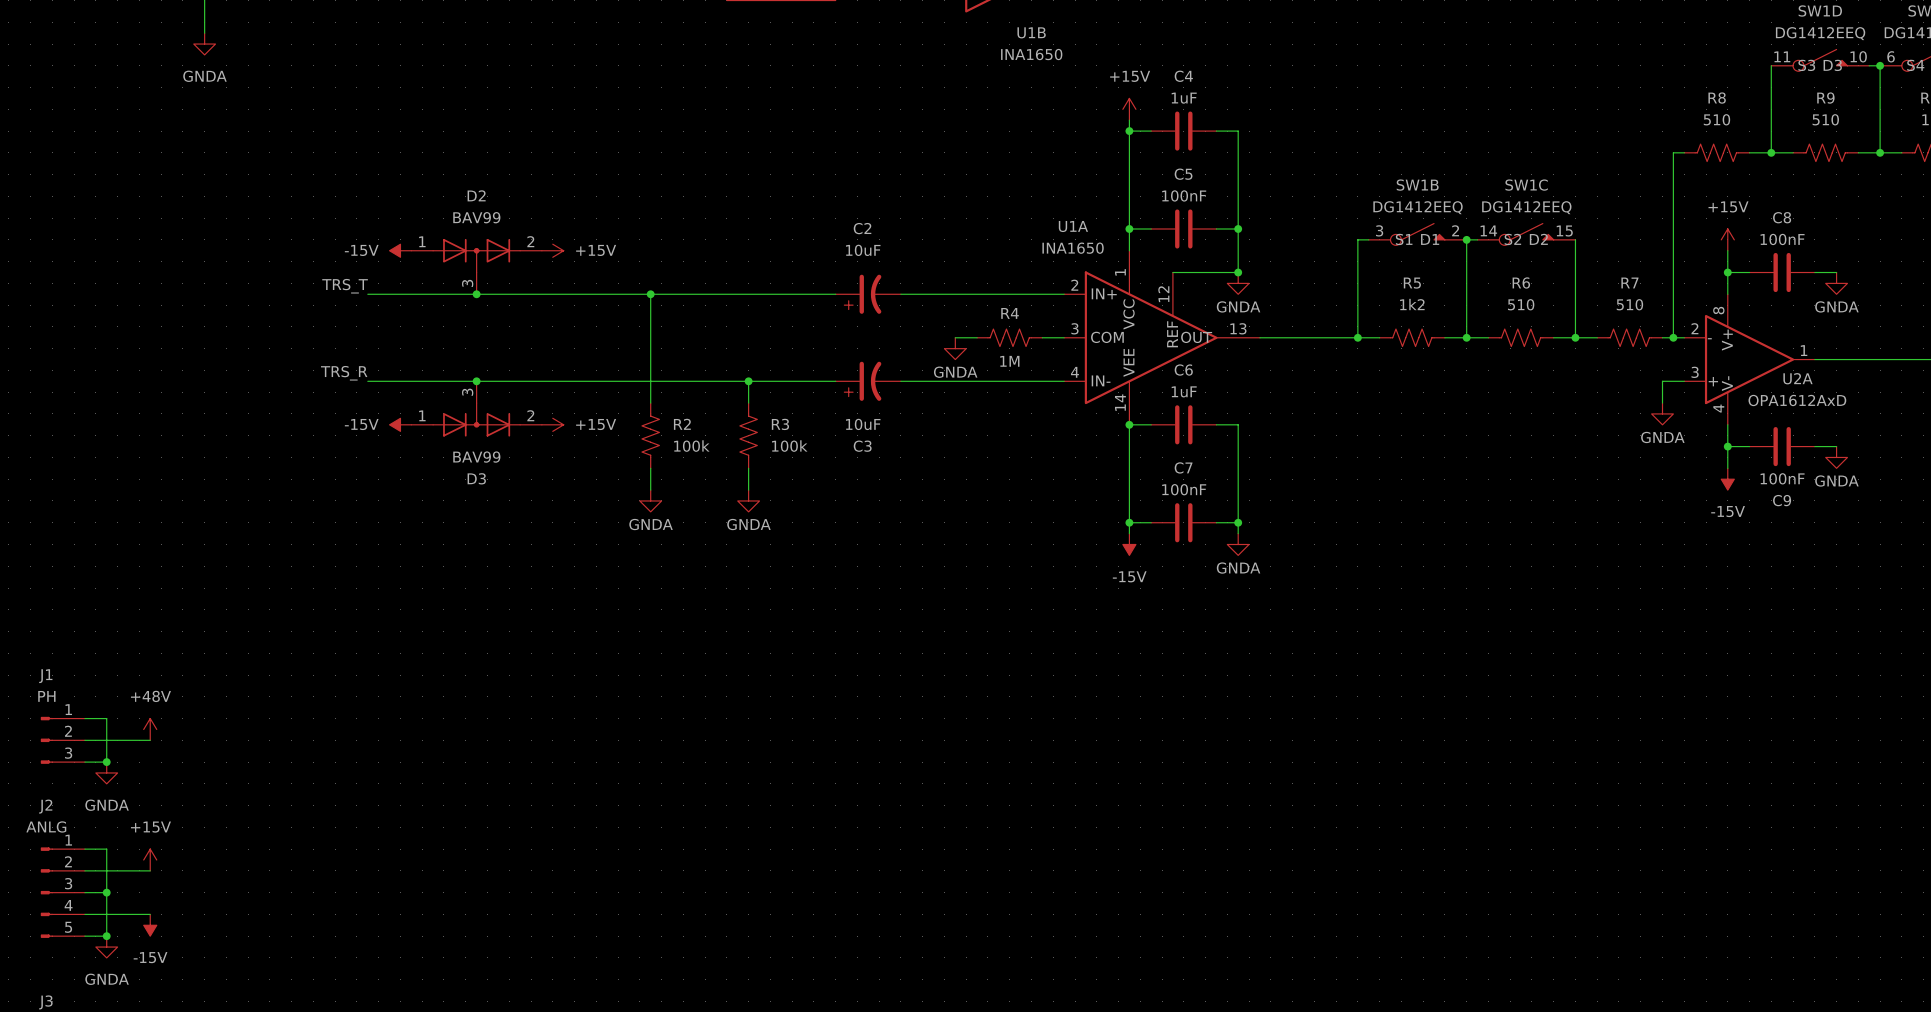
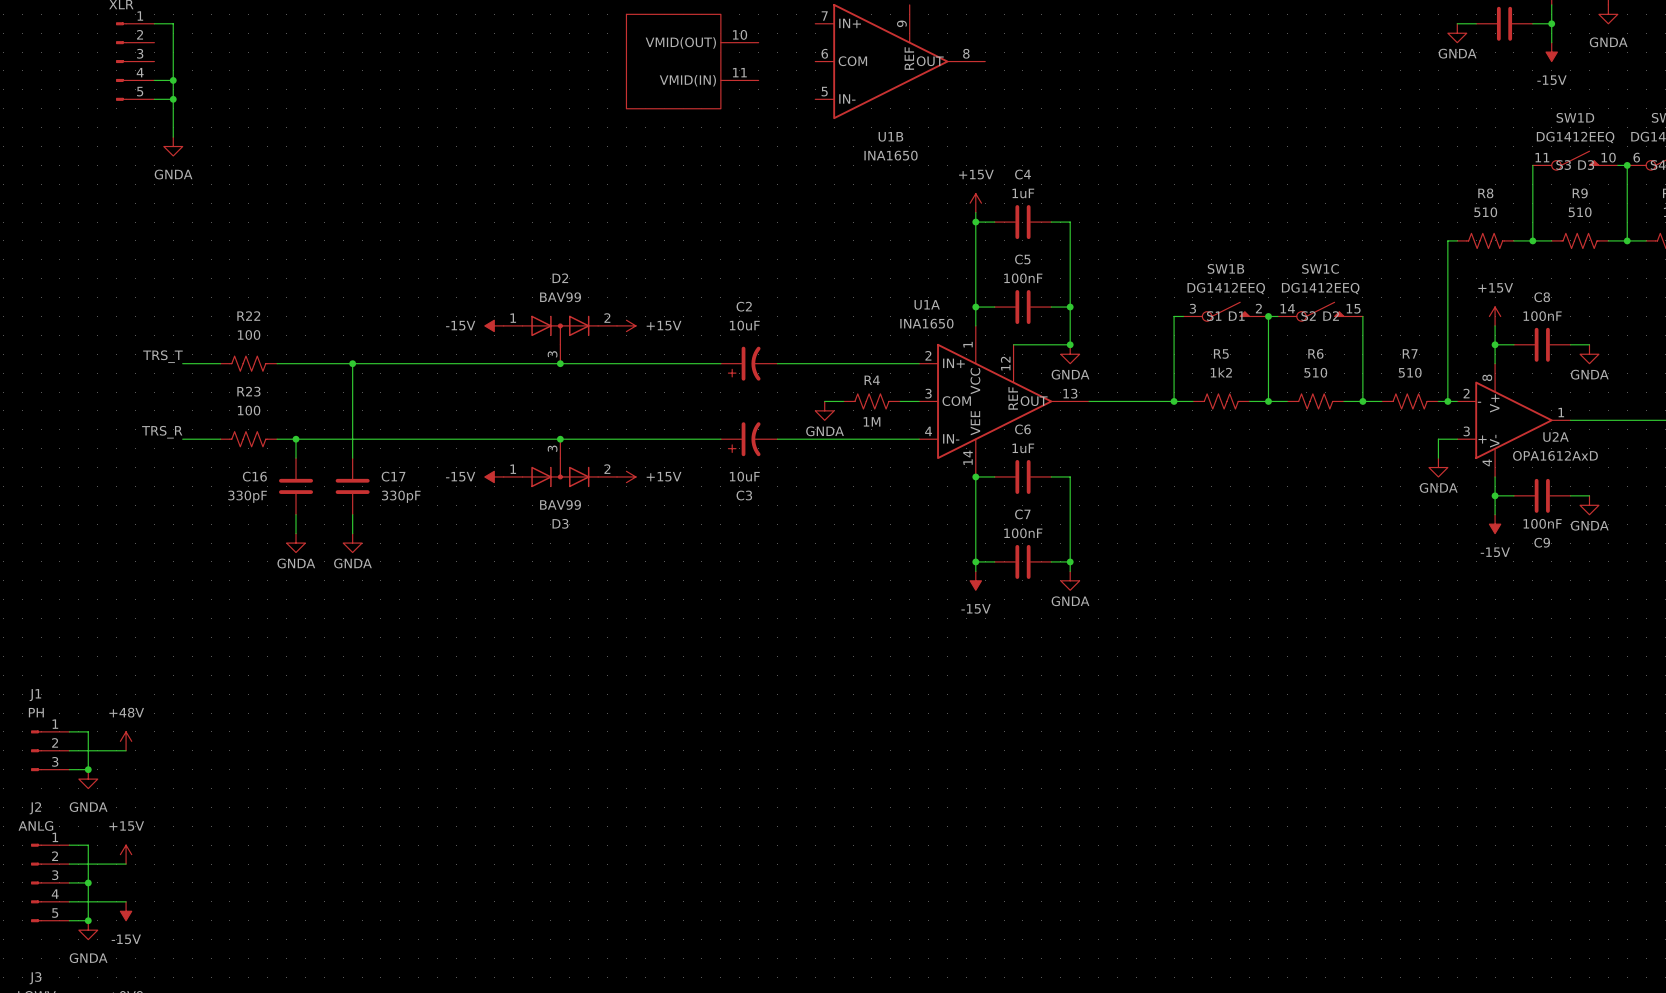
power symbol: -15V (400, 250) -> none
power symbol: +15V (552, 250) -> none
power symbol: none -> -15V (494, 325)
power symbol: none -> +15V (626, 325)
D2 position: (476, 266) -> (560, 339)
label position: TRS_T (345, 286) -> TRS_T (162, 356)
wire: none -> (182, 363) (220, 363)
R22: none -> 100 (248, 363)
wire: none -> (277, 363) (314, 363)
wire: none -> (352, 363) (352, 458)
junction: none -> (352, 363)
junction: (476, 294) -> none
wire: (650, 294) (650, 403) -> none
label position: TRS_R (344, 373) -> TRS_R (162, 432)
wire: none -> (182, 439) (220, 439)
R23: none -> 100 (248, 439)
wire: none -> (277, 439) (314, 439)
wire: none -> (296, 439) (296, 458)
junction: none -> (296, 439)
junction: (476, 381) -> none
junction: none -> (560, 439)
wire: (748, 381) (748, 403) -> none
junction: (748, 381) -> none
D3 position: (476, 408) -> (560, 463)
power symbol: -15V (400, 424) -> none
power symbol: +15V (552, 424) -> none
power symbol: none -> -15V (494, 476)
power symbol: none -> +15V (626, 476)
C16: none -> 330pF (296, 486)
C17: none -> 330pF (352, 486)
R2: 100k (650, 435) -> none
R3: 100k (748, 435) -> none
wire: none -> (296, 514) (296, 533)
wire: none -> (352, 514) (352, 533)
wire: (650, 468) (650, 490) -> none
wire: (748, 468) (748, 490) -> none
power symbol: none -> GNDA (296, 543)
power symbol: none -> GNDA (352, 543)
power symbol: GNDA (650, 500) -> none
power symbol: GNDA (748, 500) -> none

